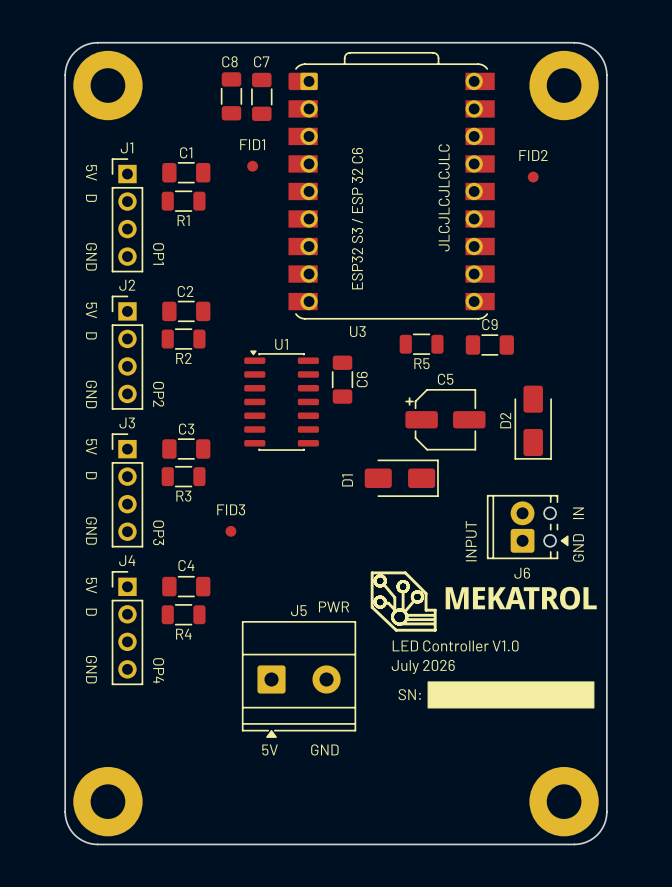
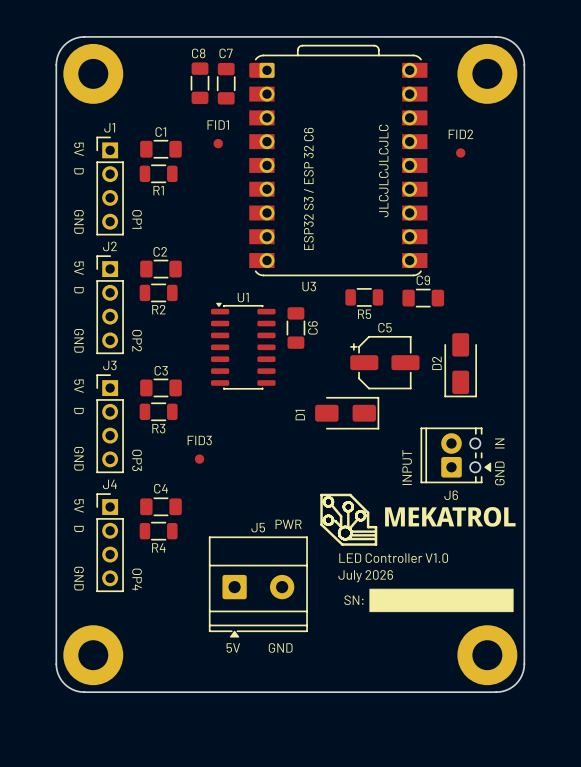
board edge: (65, 768) (65, 811) (68, 826) (80, 839) (97, 844) (578, 844) (594, 837) (604, 824) (606, 811) (606, 768) -> (56, 664) (57, 673) (64, 683) (75, 690) (84, 692) (496, 692) (507, 690) (516, 683) (522, 674) (524, 664)
part position: (107, 801) -> (93, 655)
part position: (564, 801) -> (487, 655)

